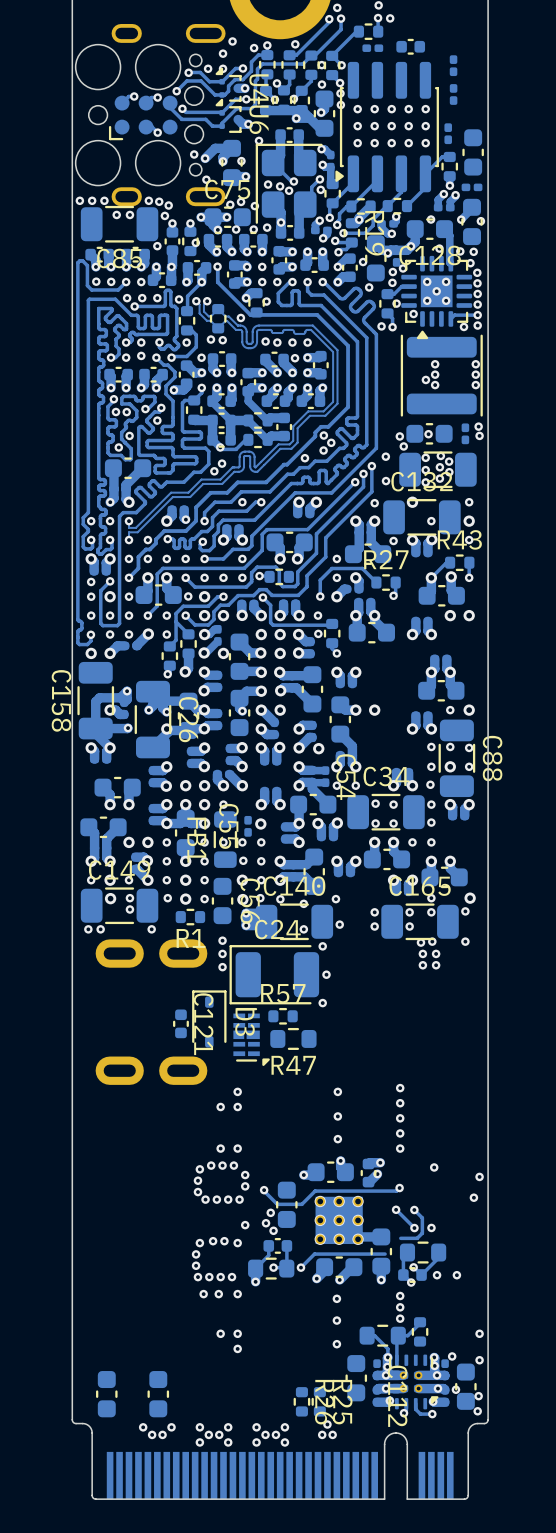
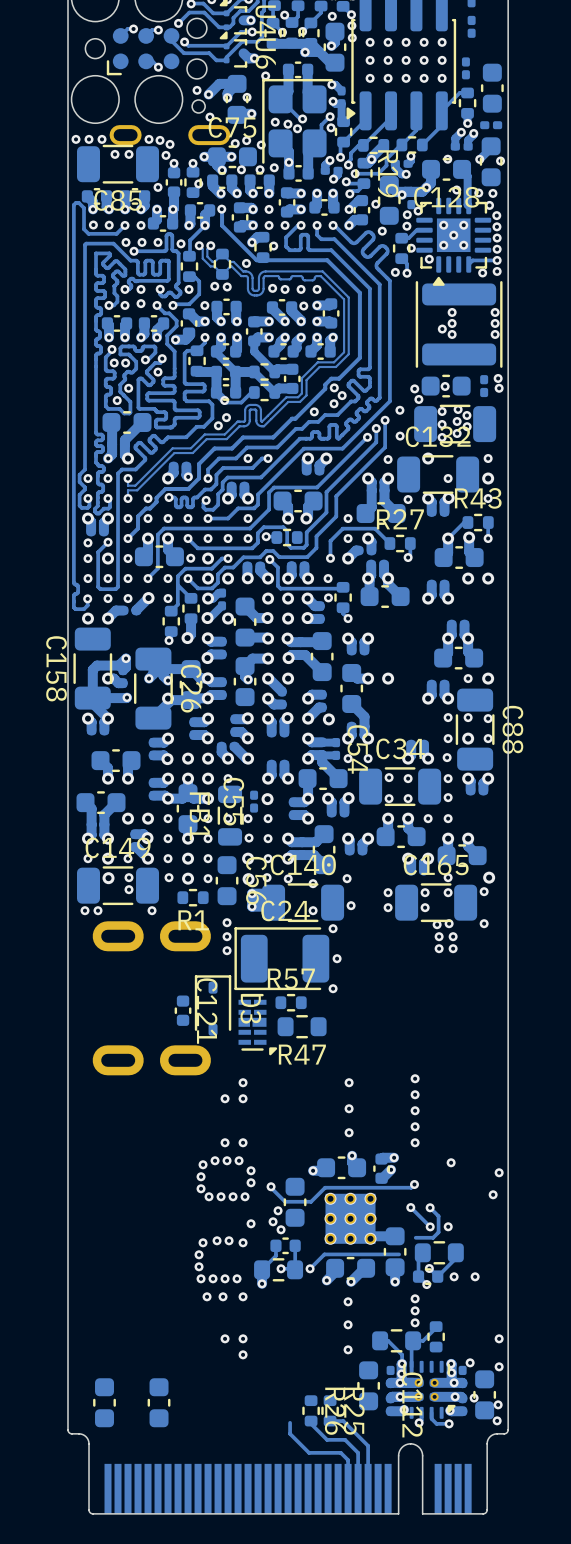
track: none -> (311, 1421) (311, 1423) (327, 1439) (345, 1439) (358, 1452) (358, 1488)
track: none -> (330, 1421) (343, 1421) (368, 1445) (368, 1488)
track: none -> (290, 1422) (290, 1433) (309, 1452) (340, 1452) (348, 1460) (348, 1488)
via: (327, 1424) -> none
via: (143, 1427) -> none
via: (171, 1427) -> none
via: (199, 1427) -> none
via: (228, 1427) -> none
via: (256, 1427) -> none
via: (284, 1427) -> none
via: (152, 1434) -> none
via: (162, 1434) -> none
via: (208, 1434) -> none
via: (219, 1434) -> none
via: (265, 1434) -> none
via: (275, 1434) -> none
via: (322, 1434) -> none
via: (332, 1434) -> none
via: (199, 1442) -> none
via: (228, 1442) -> none
via: (256, 1442) -> none
via: (284, 1442) -> none

